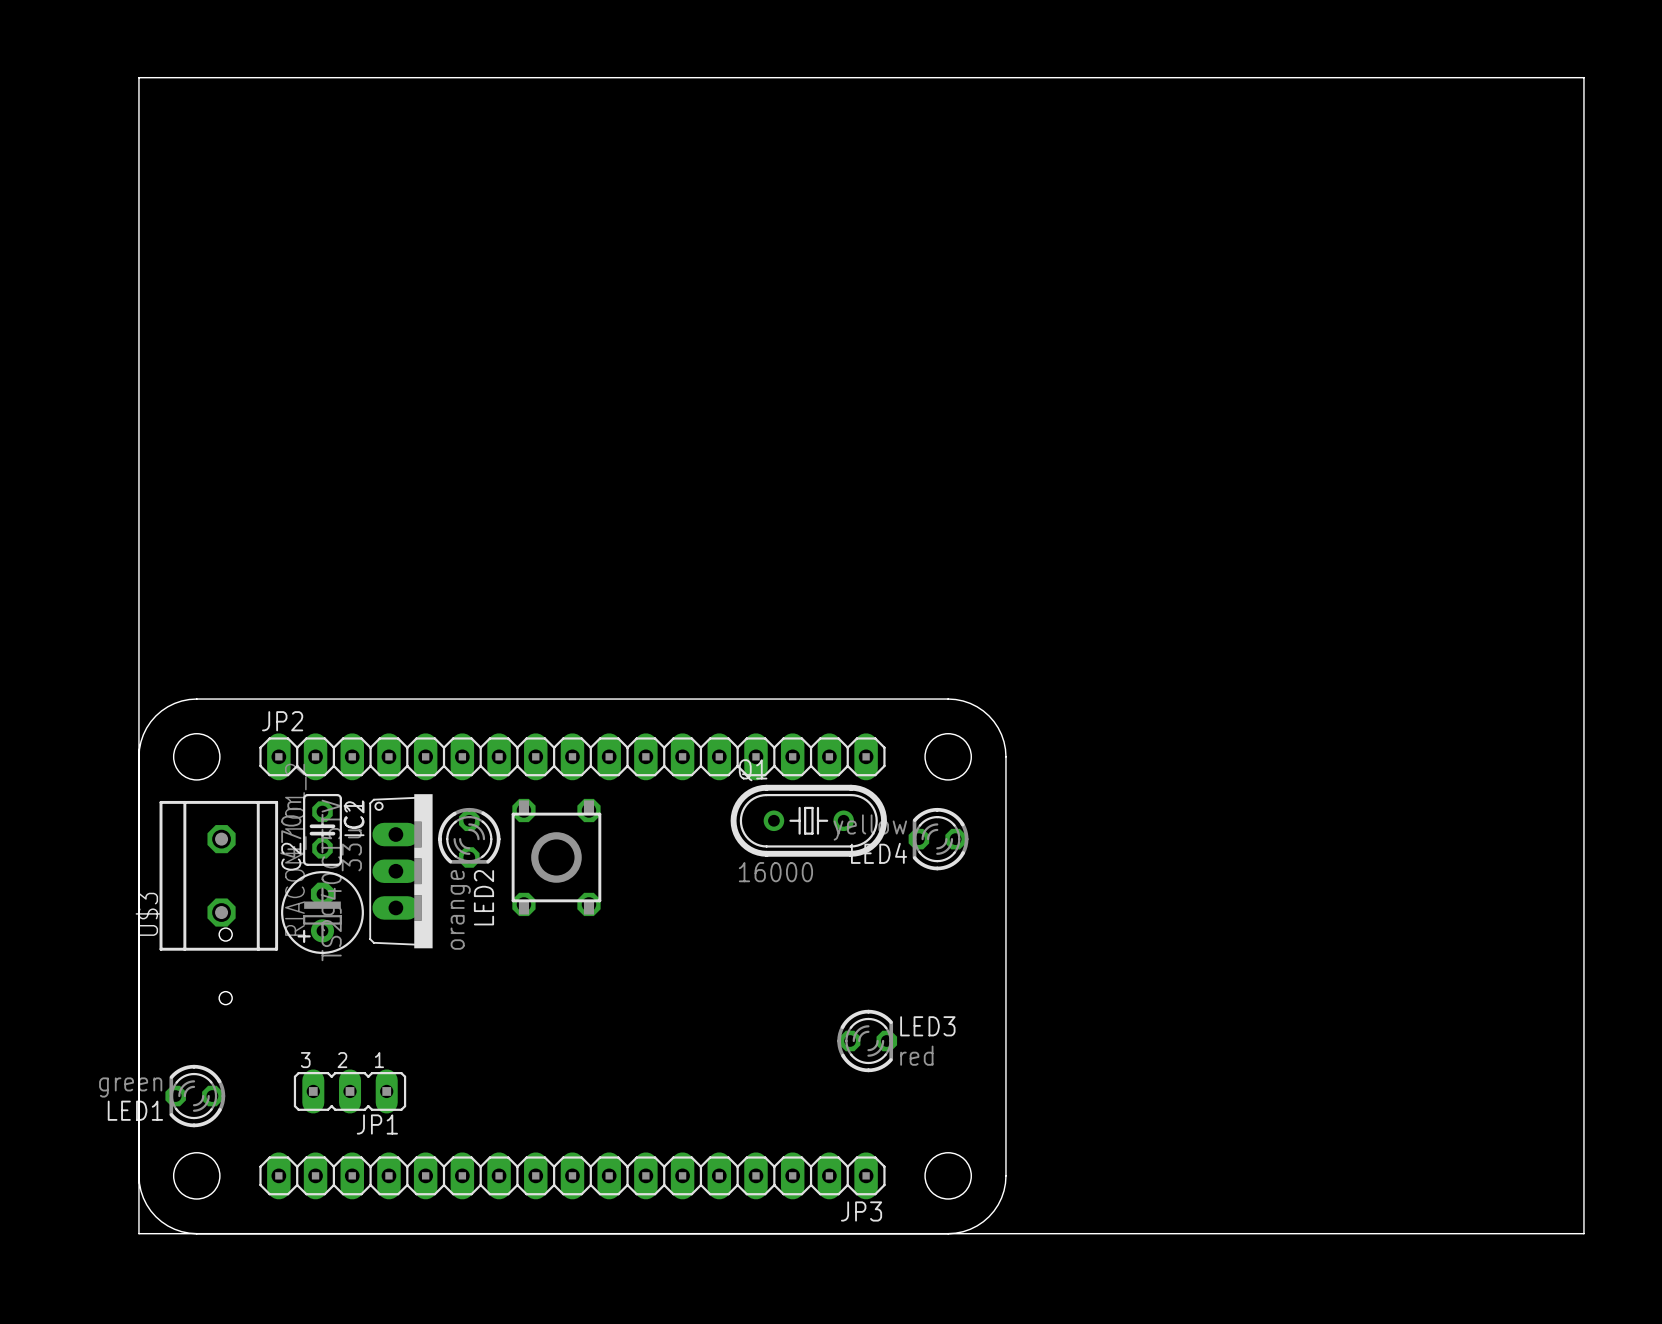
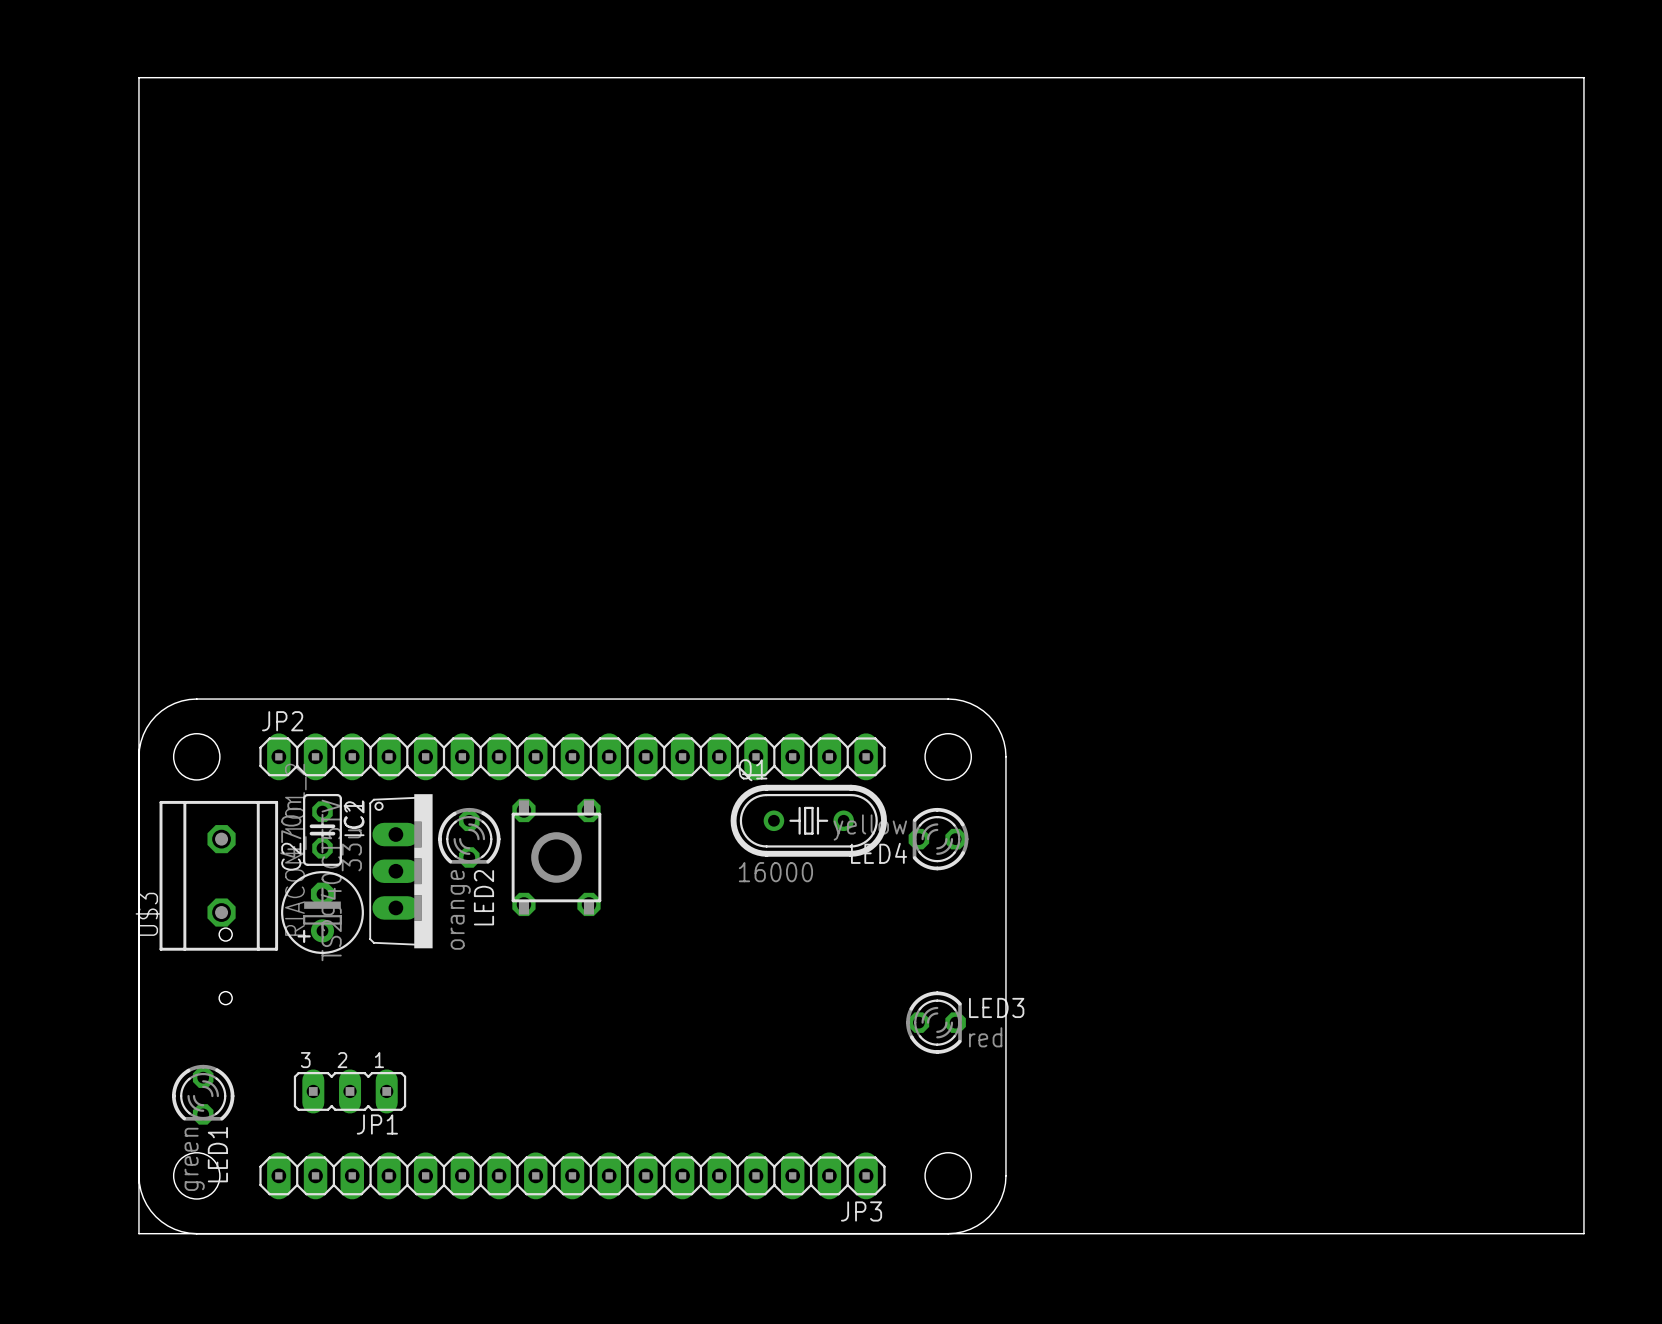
LED3 position: (867, 1040) -> (935, 1022)
LED1 rotation: 0° (195, 1096) -> 90° counterclockwise (203, 1094)

